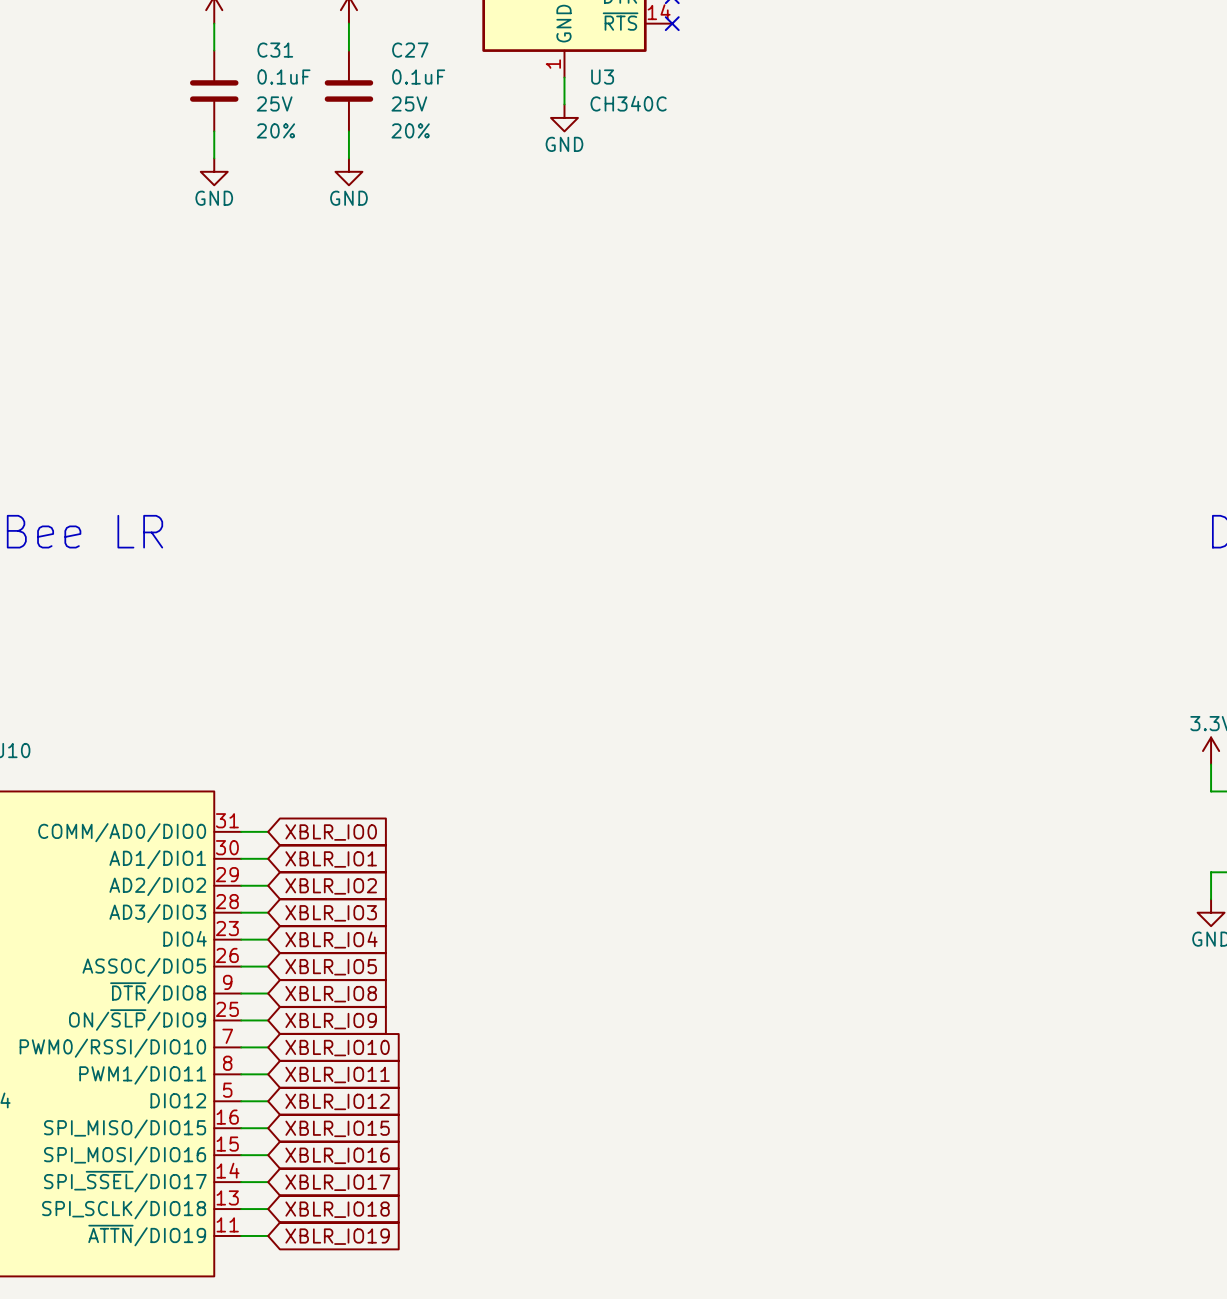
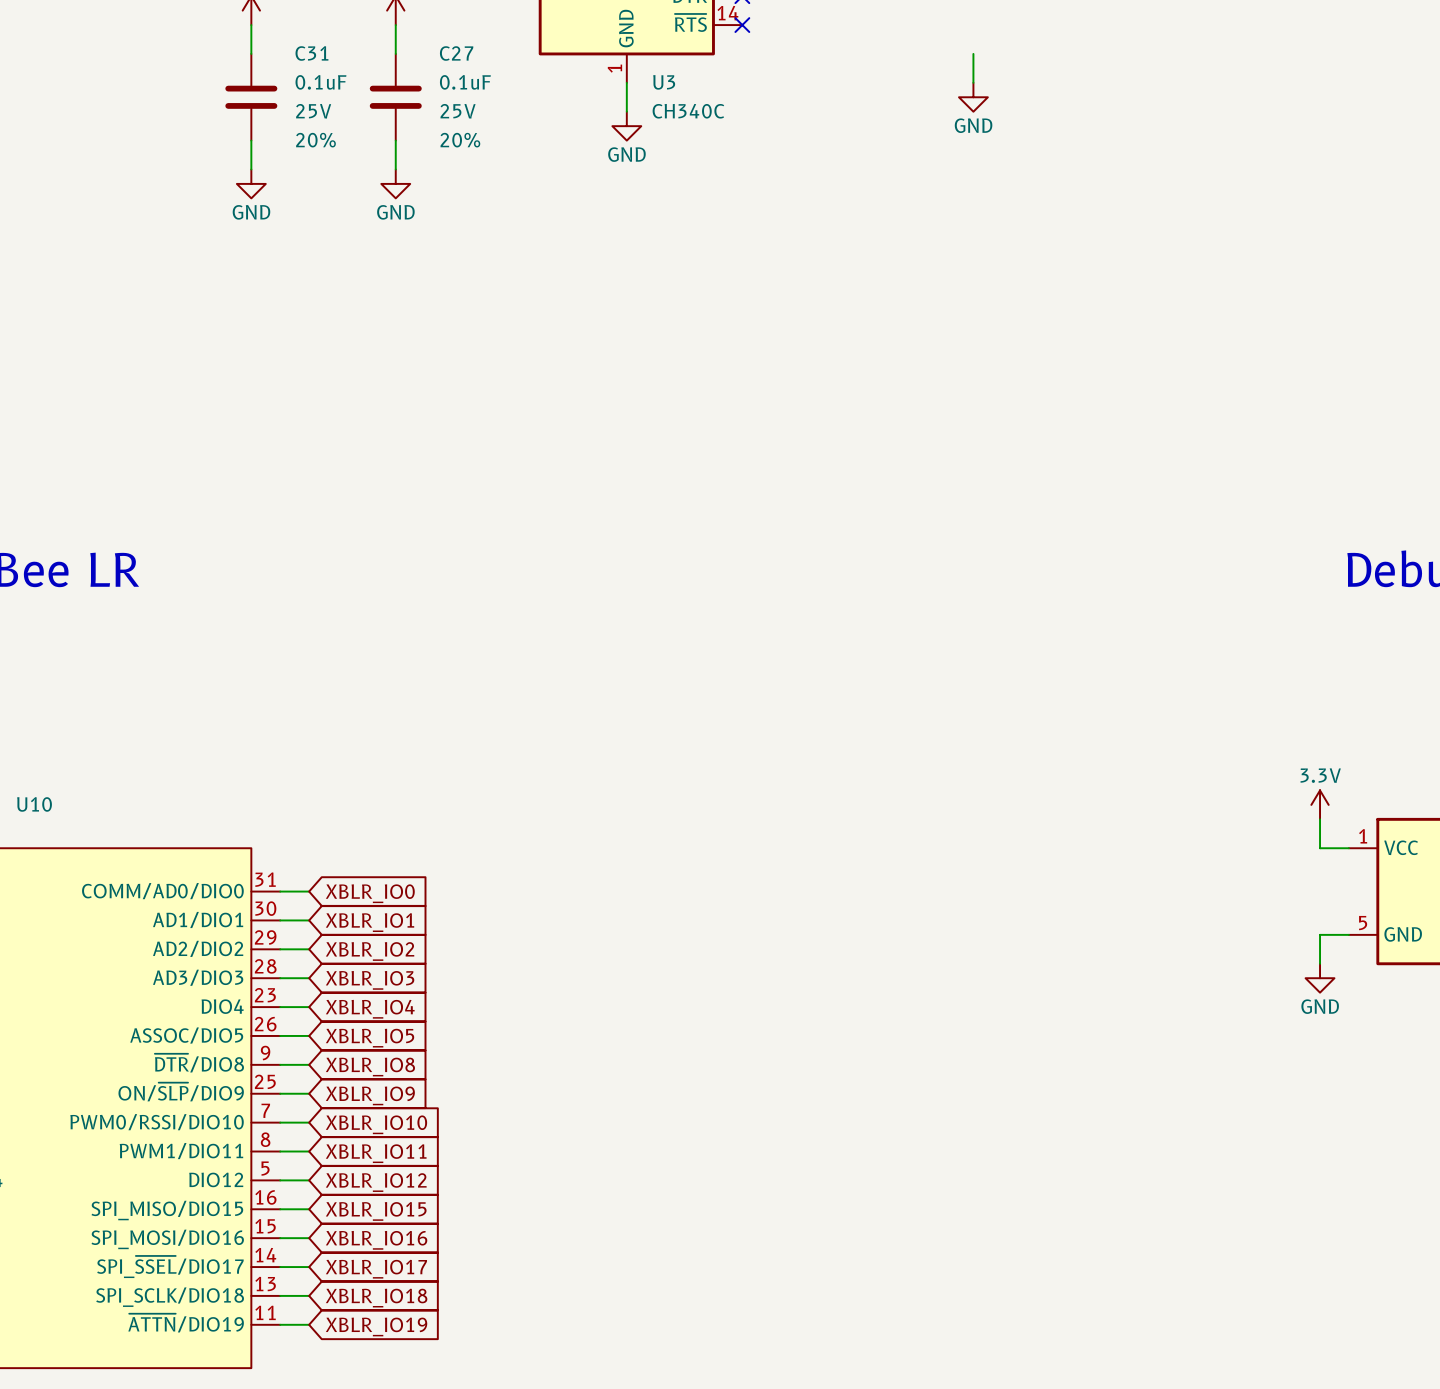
wire: none -> (973, 53) (973, 82)
power symbol: none -> GND (973, 97)

